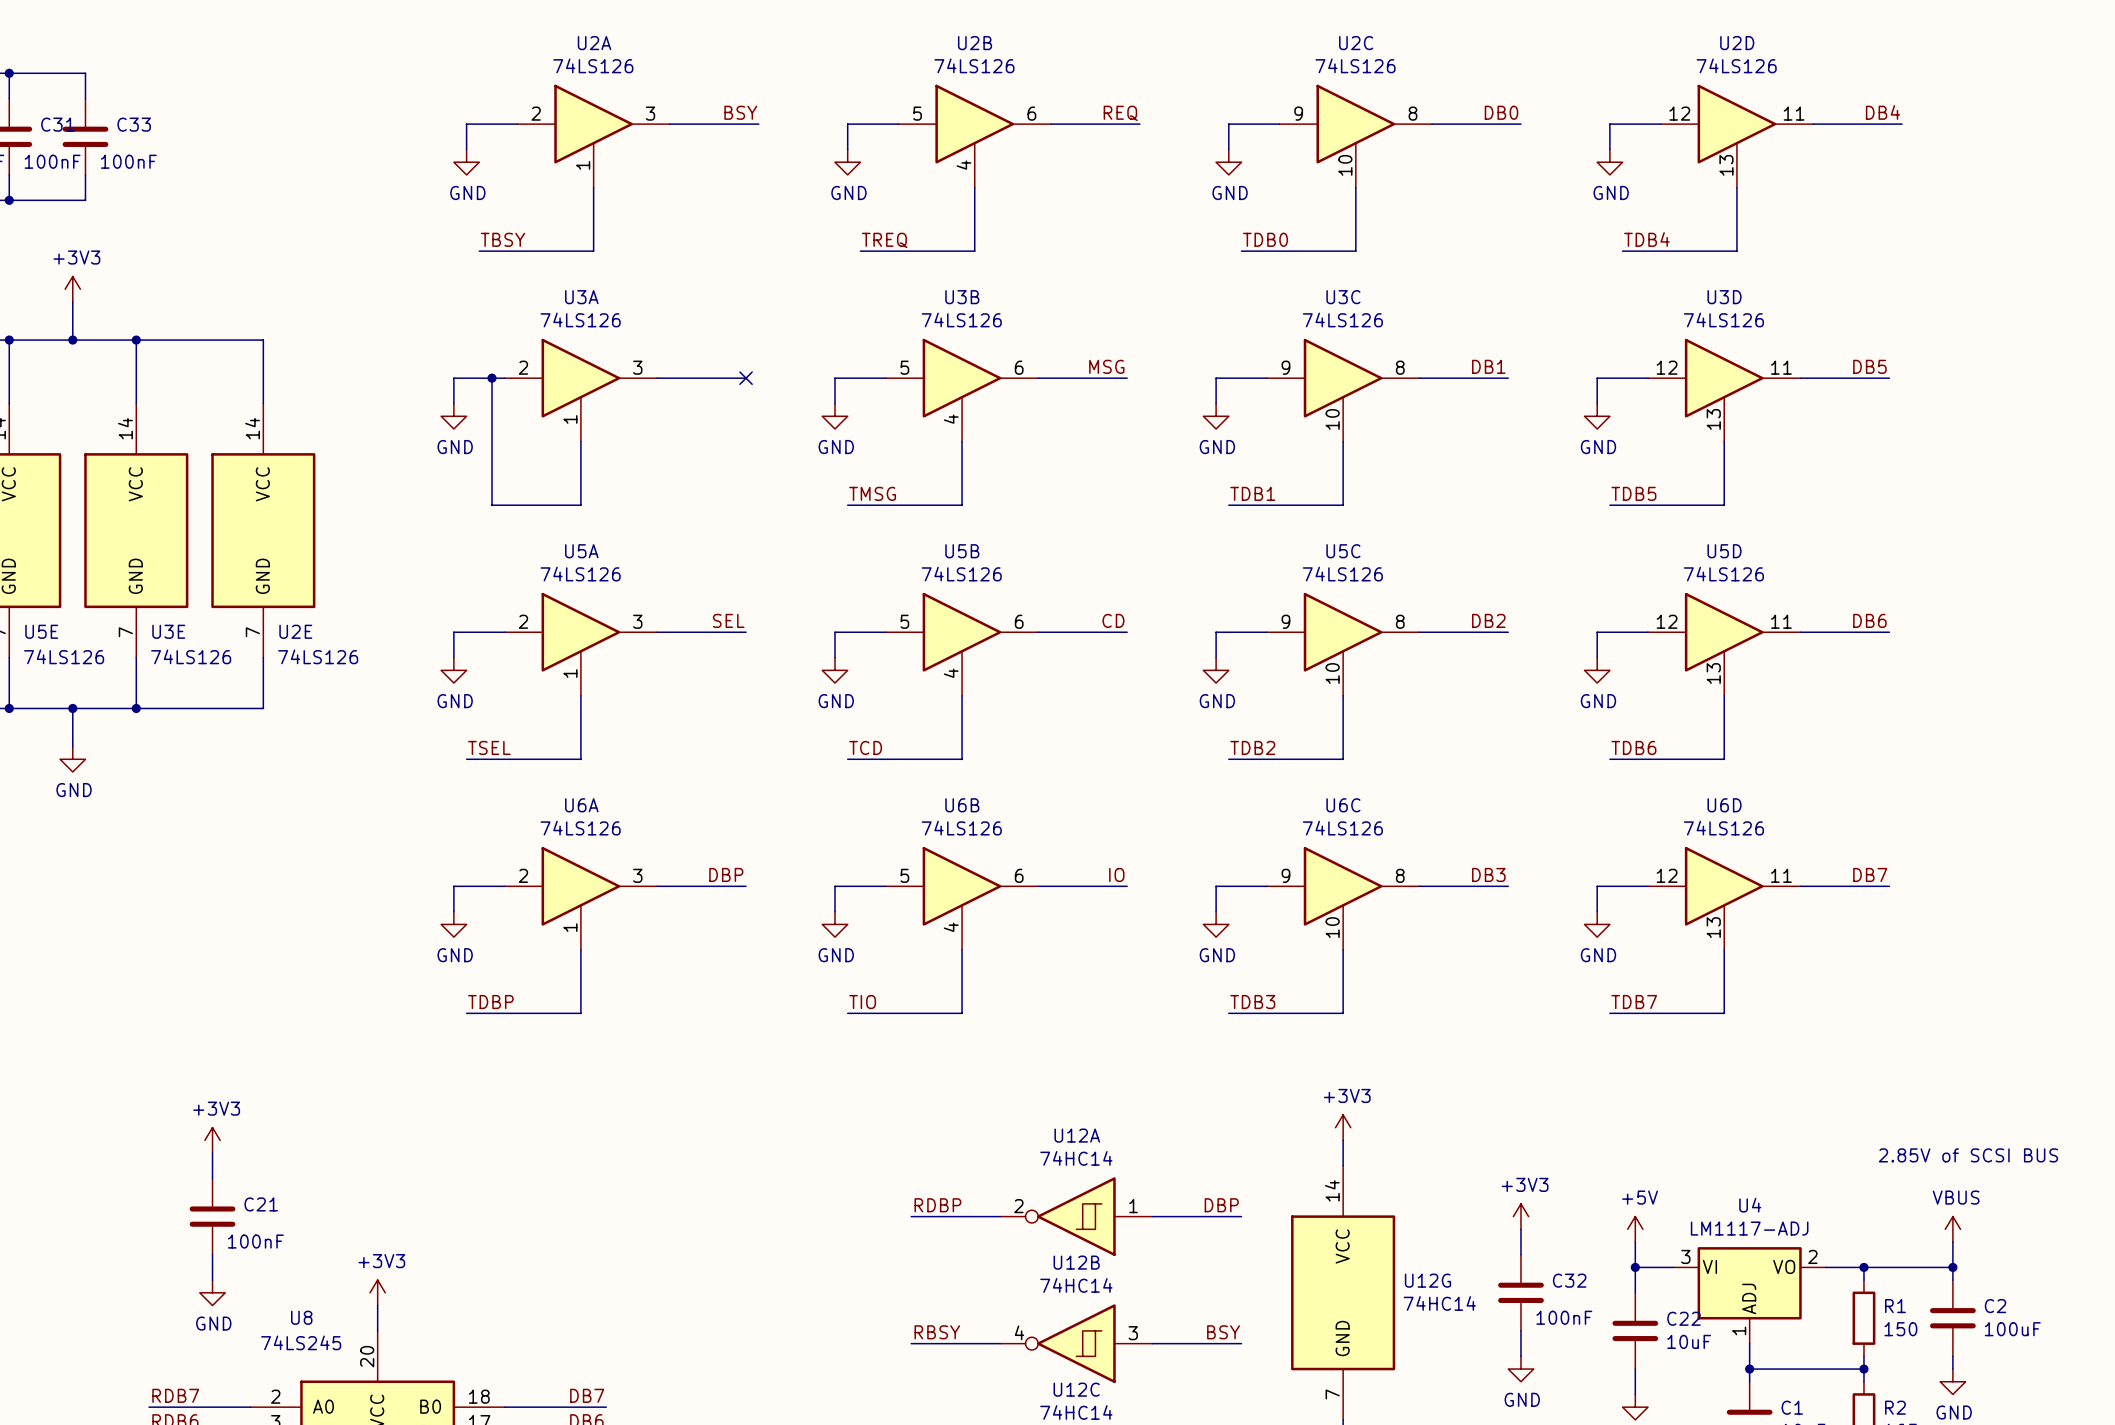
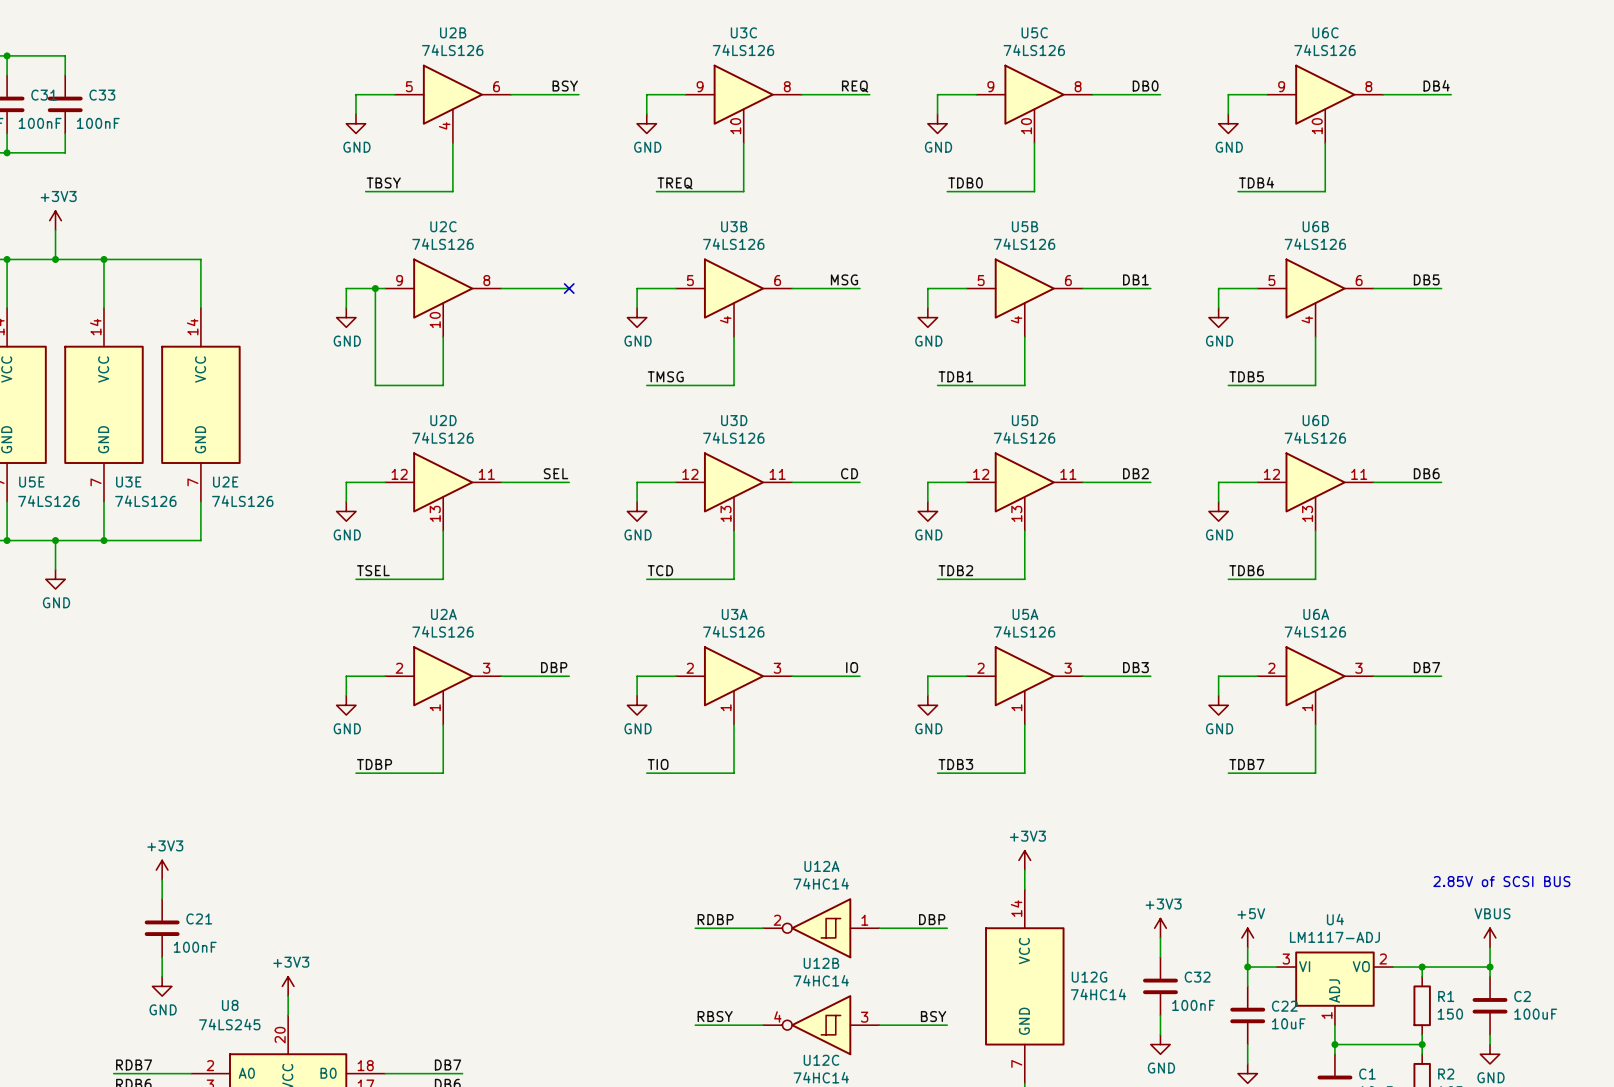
U2C name: U2C (1356, 43) -> U5C (1034, 32)
U2A: 74LS126 (593, 136) -> none
U2B position: (974, 136) -> (452, 103)
U2D position: (1736, 136) -> (443, 491)
U3A position: (580, 390) -> (734, 685)
U2C: none -> 74LS126 (443, 297)
U3C position: (1343, 390) -> (743, 103)
U3D position: (1724, 390) -> (734, 491)
U5C name: U5C (1343, 551) -> U5D (1025, 420)
U5D name: U5D (1724, 551) -> U6D (1315, 420)
U5C pin number: 9 (1285, 621) -> 12 (981, 474)
U5C pin number: 8 (1400, 621) -> 11 (1068, 474)
U5A position: (580, 644) -> (1024, 685)
U5B position: (962, 644) -> (1024, 297)
U5C pin number: 10 (1332, 673) -> 13 (1016, 513)
U6A name: U6A (581, 805) -> U2A (443, 614)
U6D name: U6D (1724, 805) -> U6A (1316, 614)
U6D pin number: 12 (1667, 875) -> 2 (1271, 668)
U6D pin number: 11 (1781, 875) -> 3 (1358, 668)
U6B position: (962, 898) -> (1315, 297)
U6C position: (1343, 898) -> (1325, 103)
U6D pin number: 13 (1713, 927) -> 1 (1307, 707)

